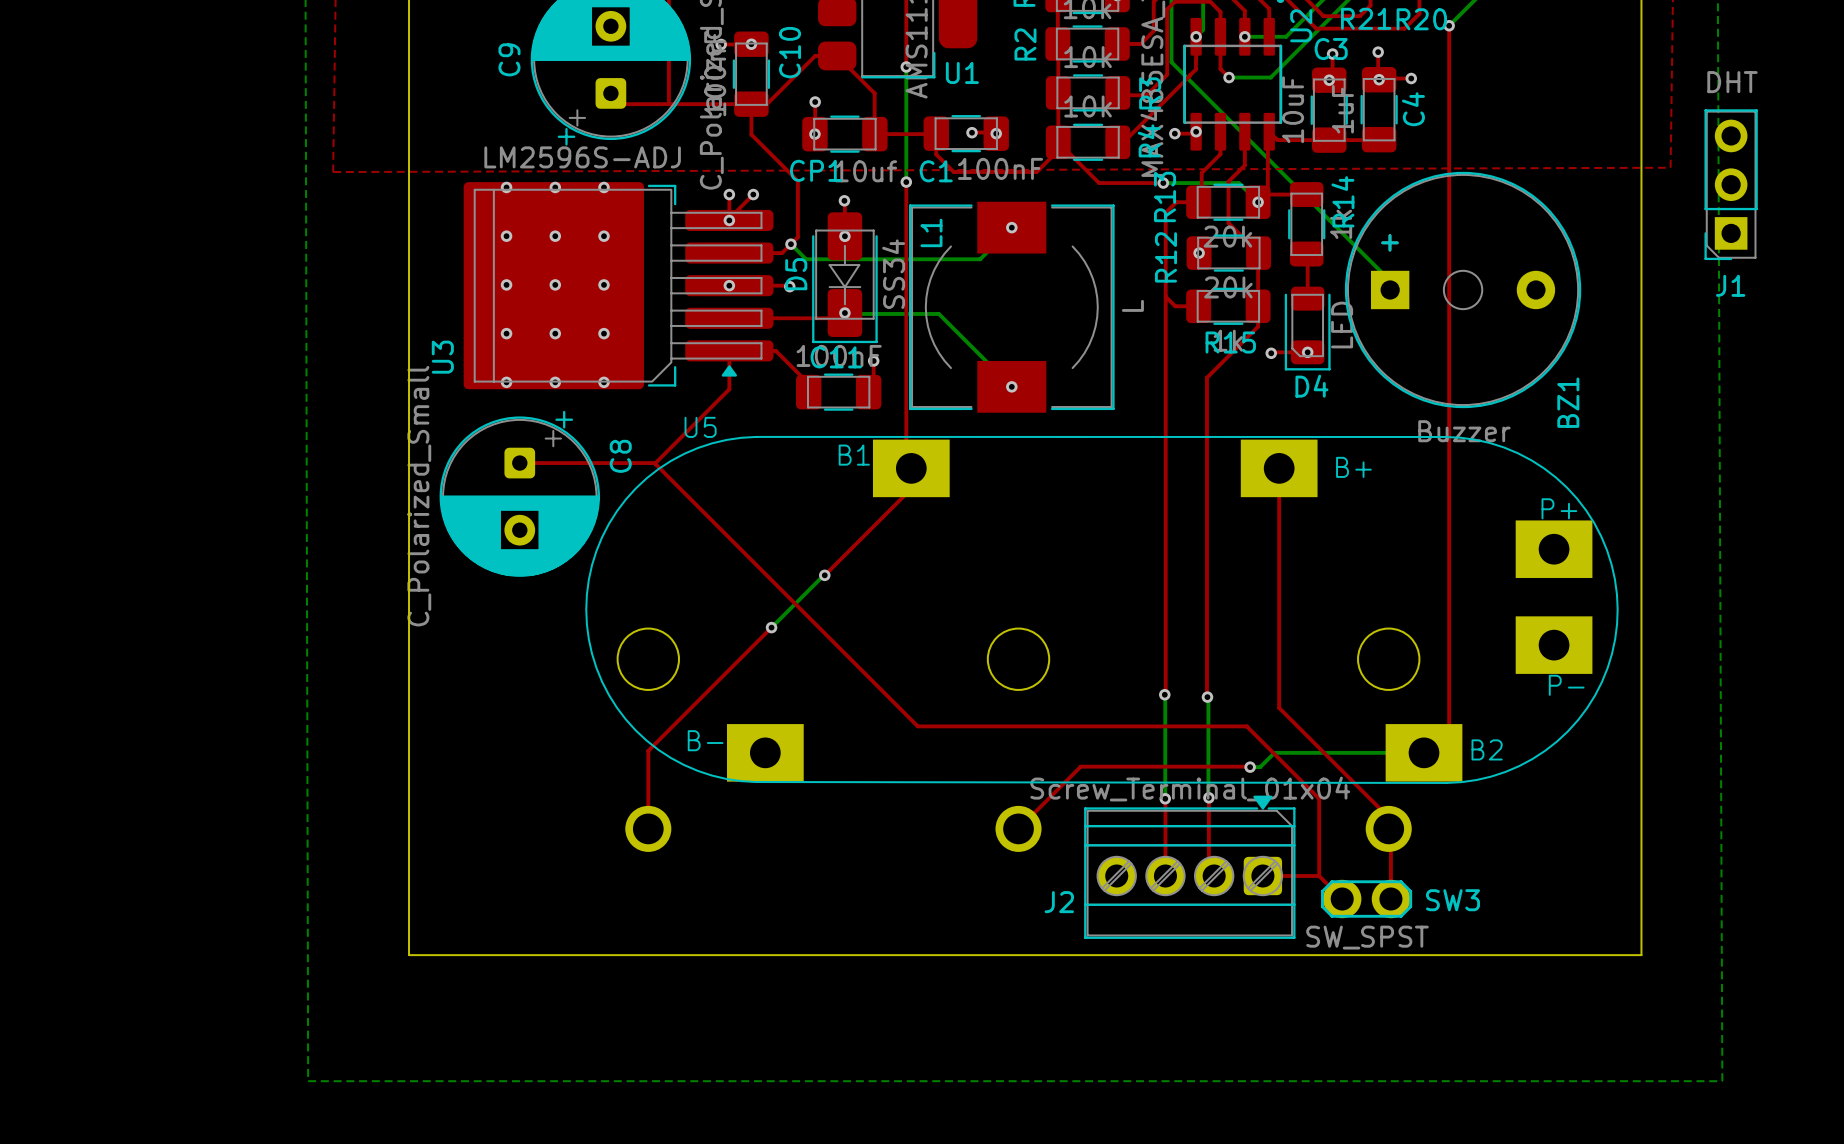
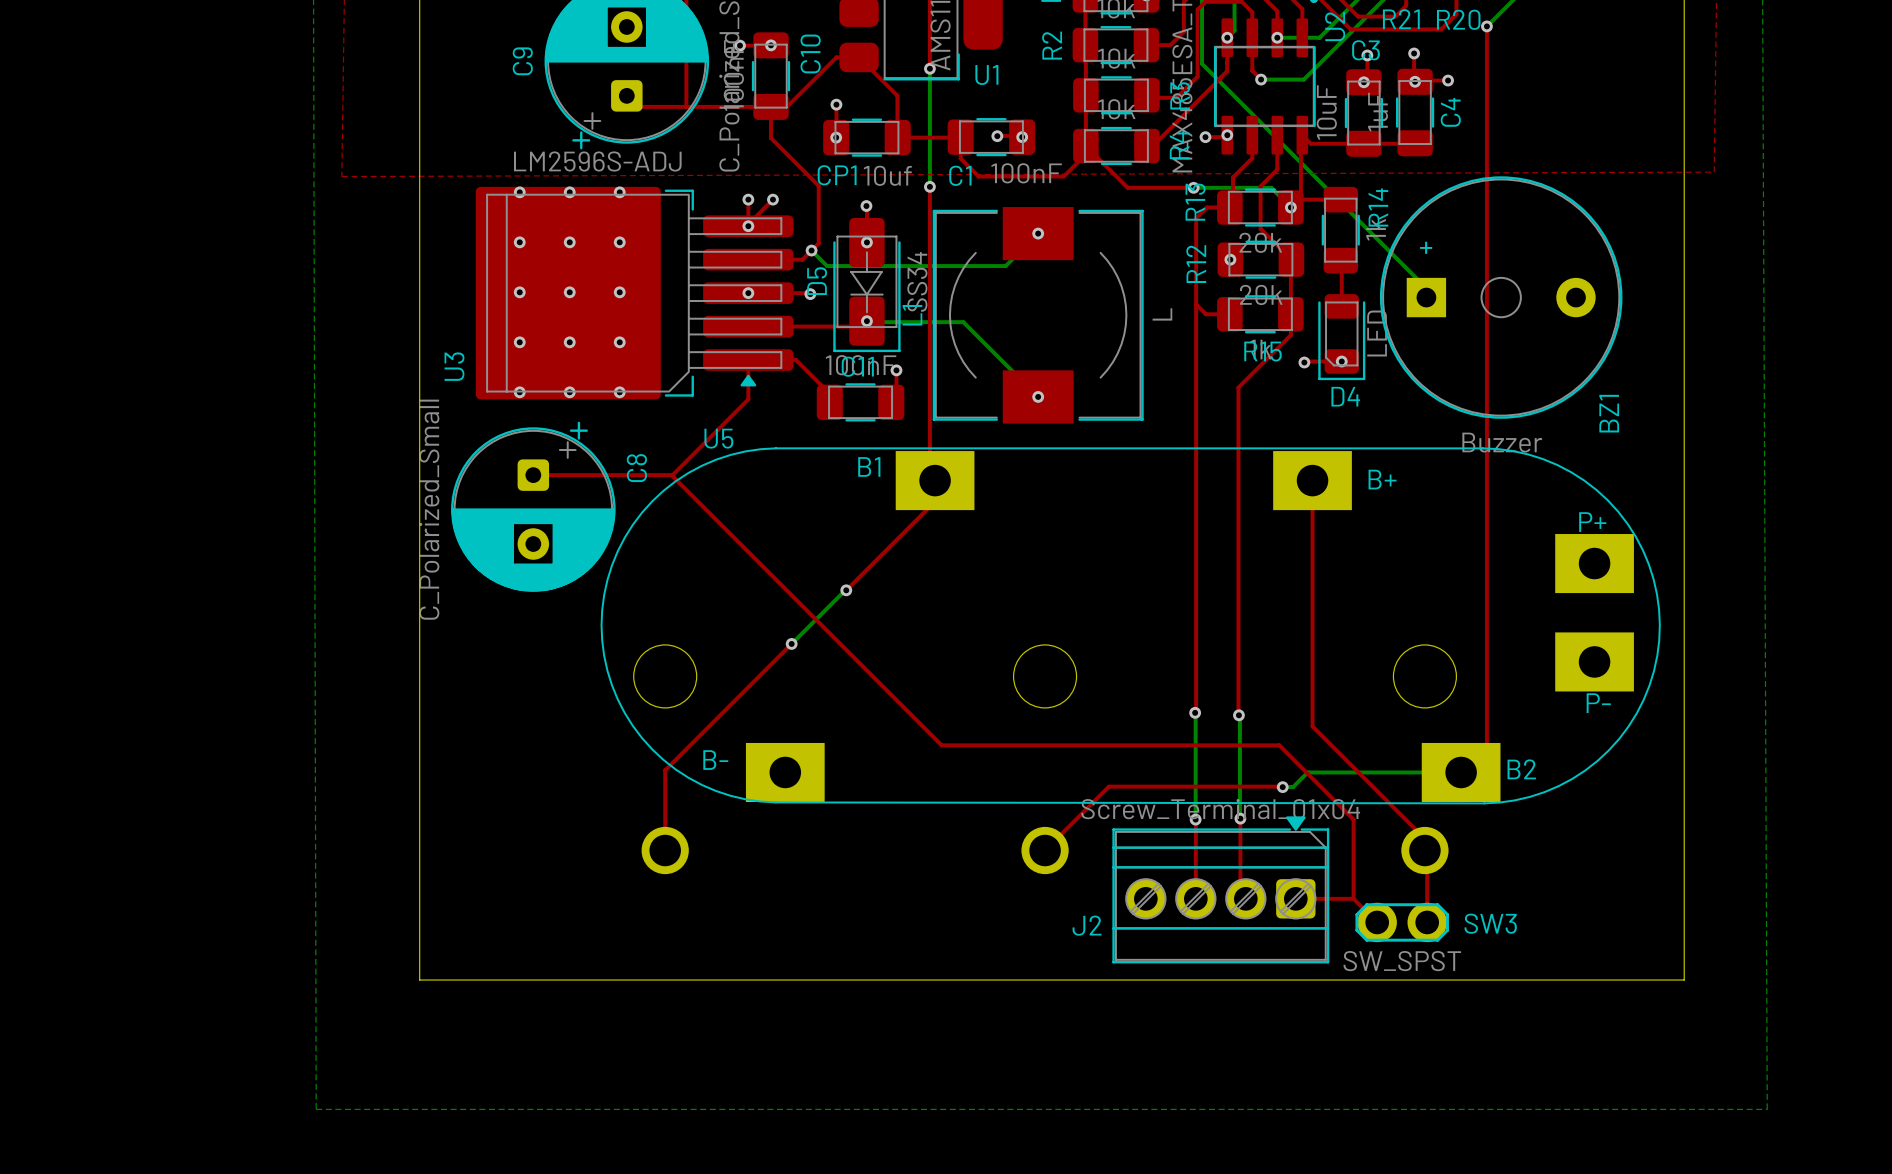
J1: DHT (1731, 184) -> none
L1 name position: L1 (931, 232) -> L1 (912, 315)

